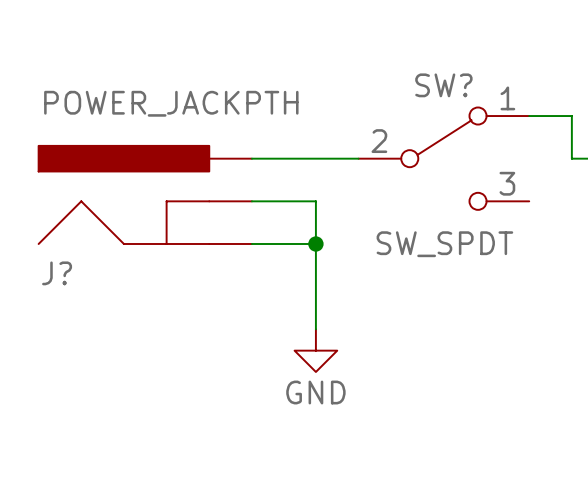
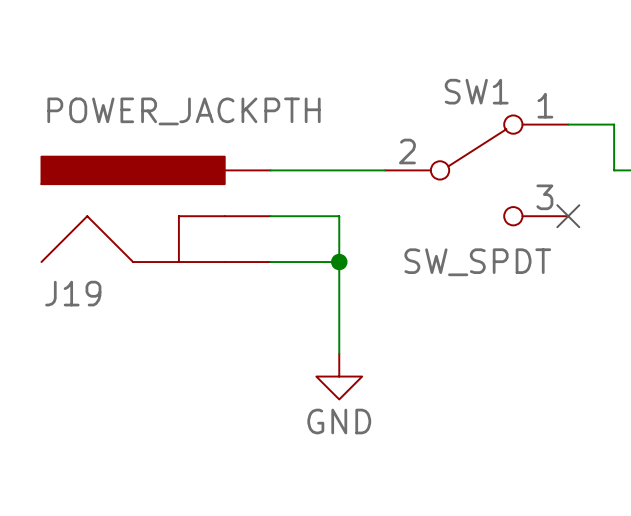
SW? name: SW? (443, 85) -> SW1 (476, 91)
no-connect mark: none -> (568, 216)
J? name: J? (57, 273) -> J19 (73, 293)

